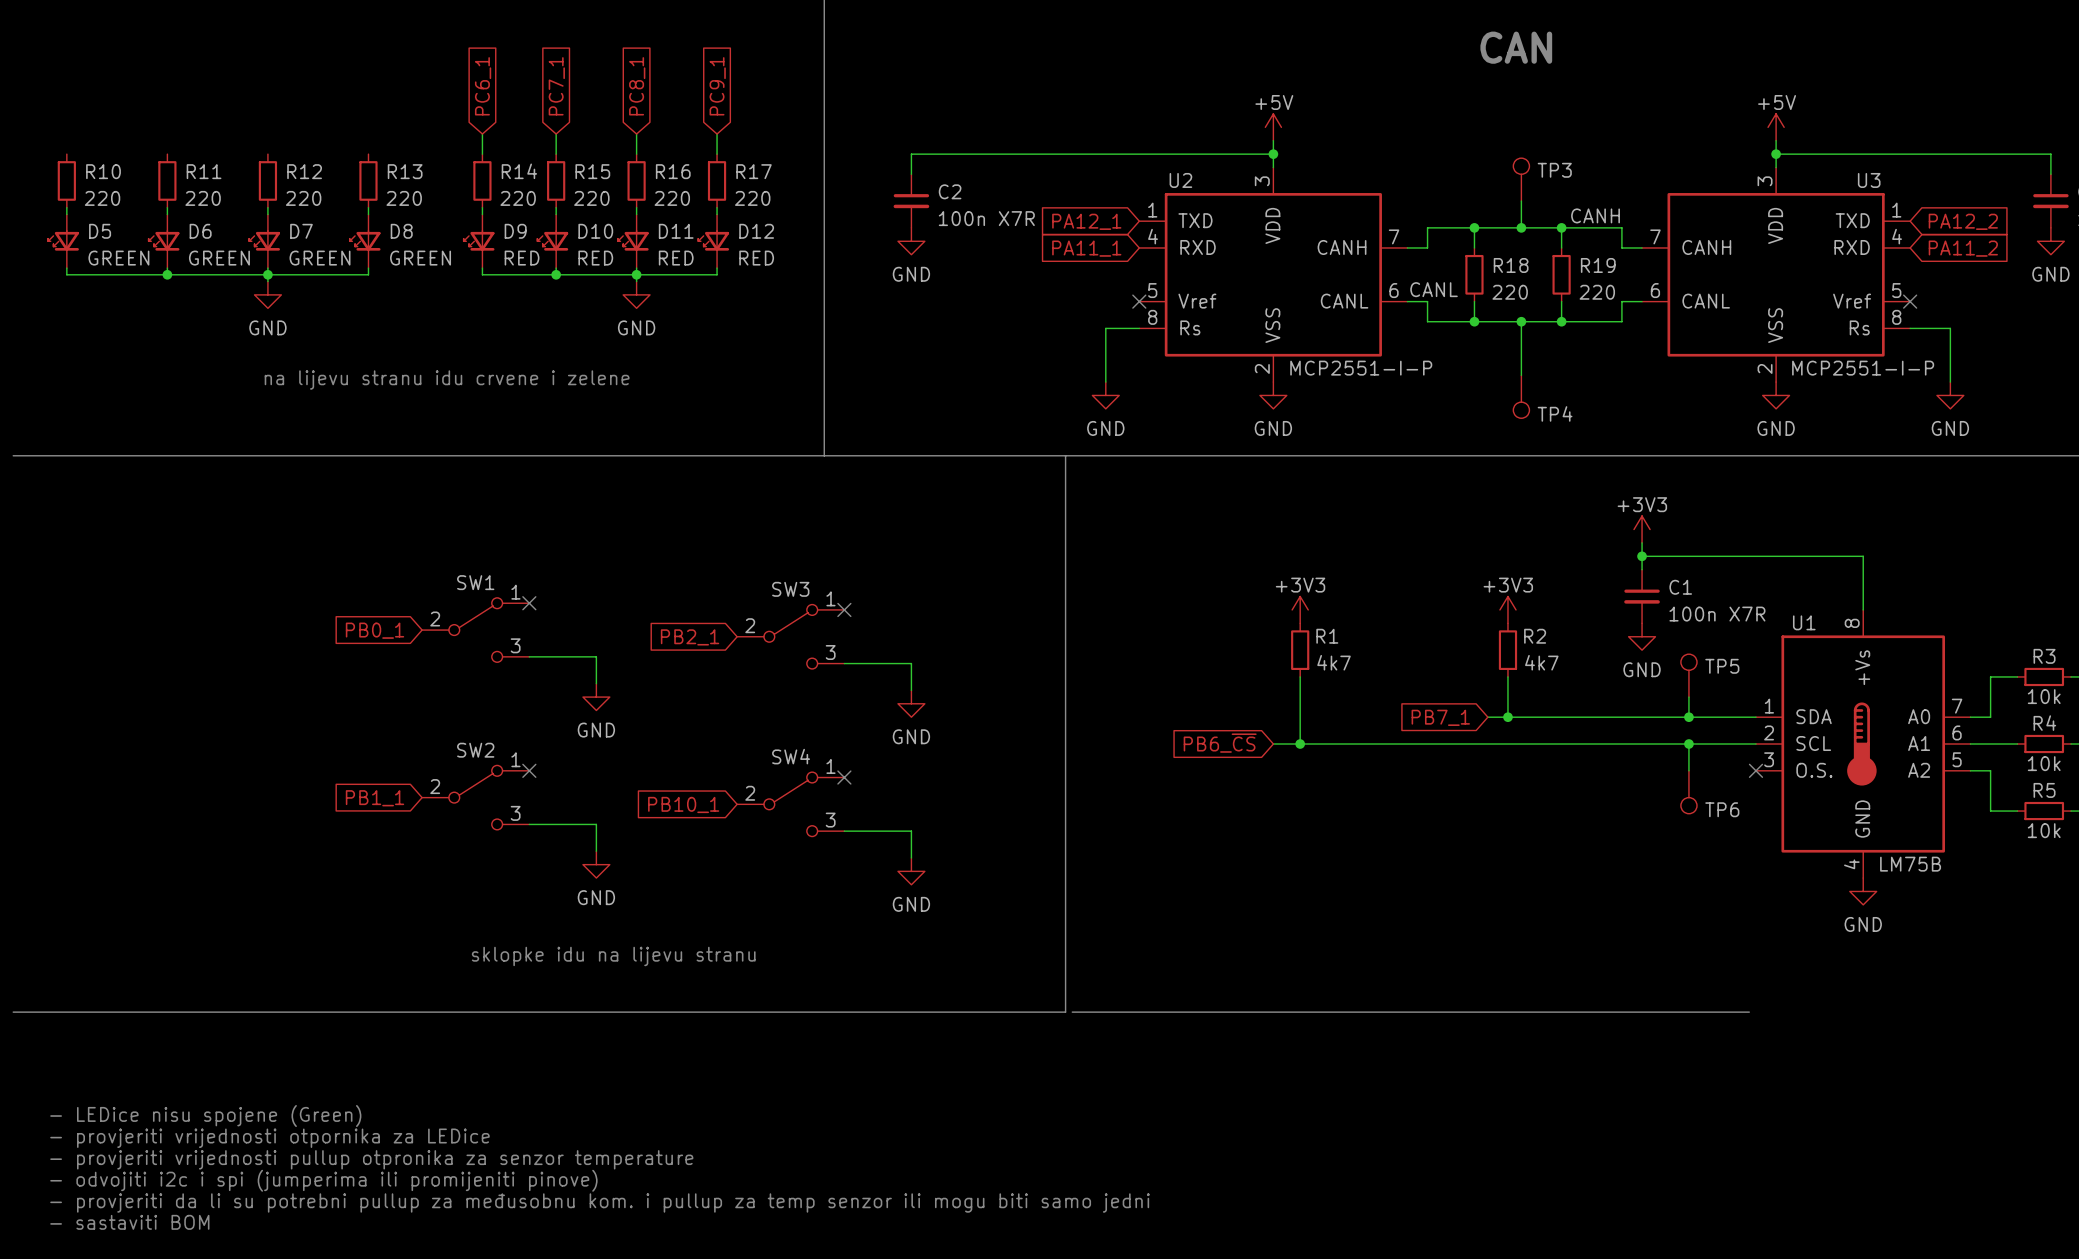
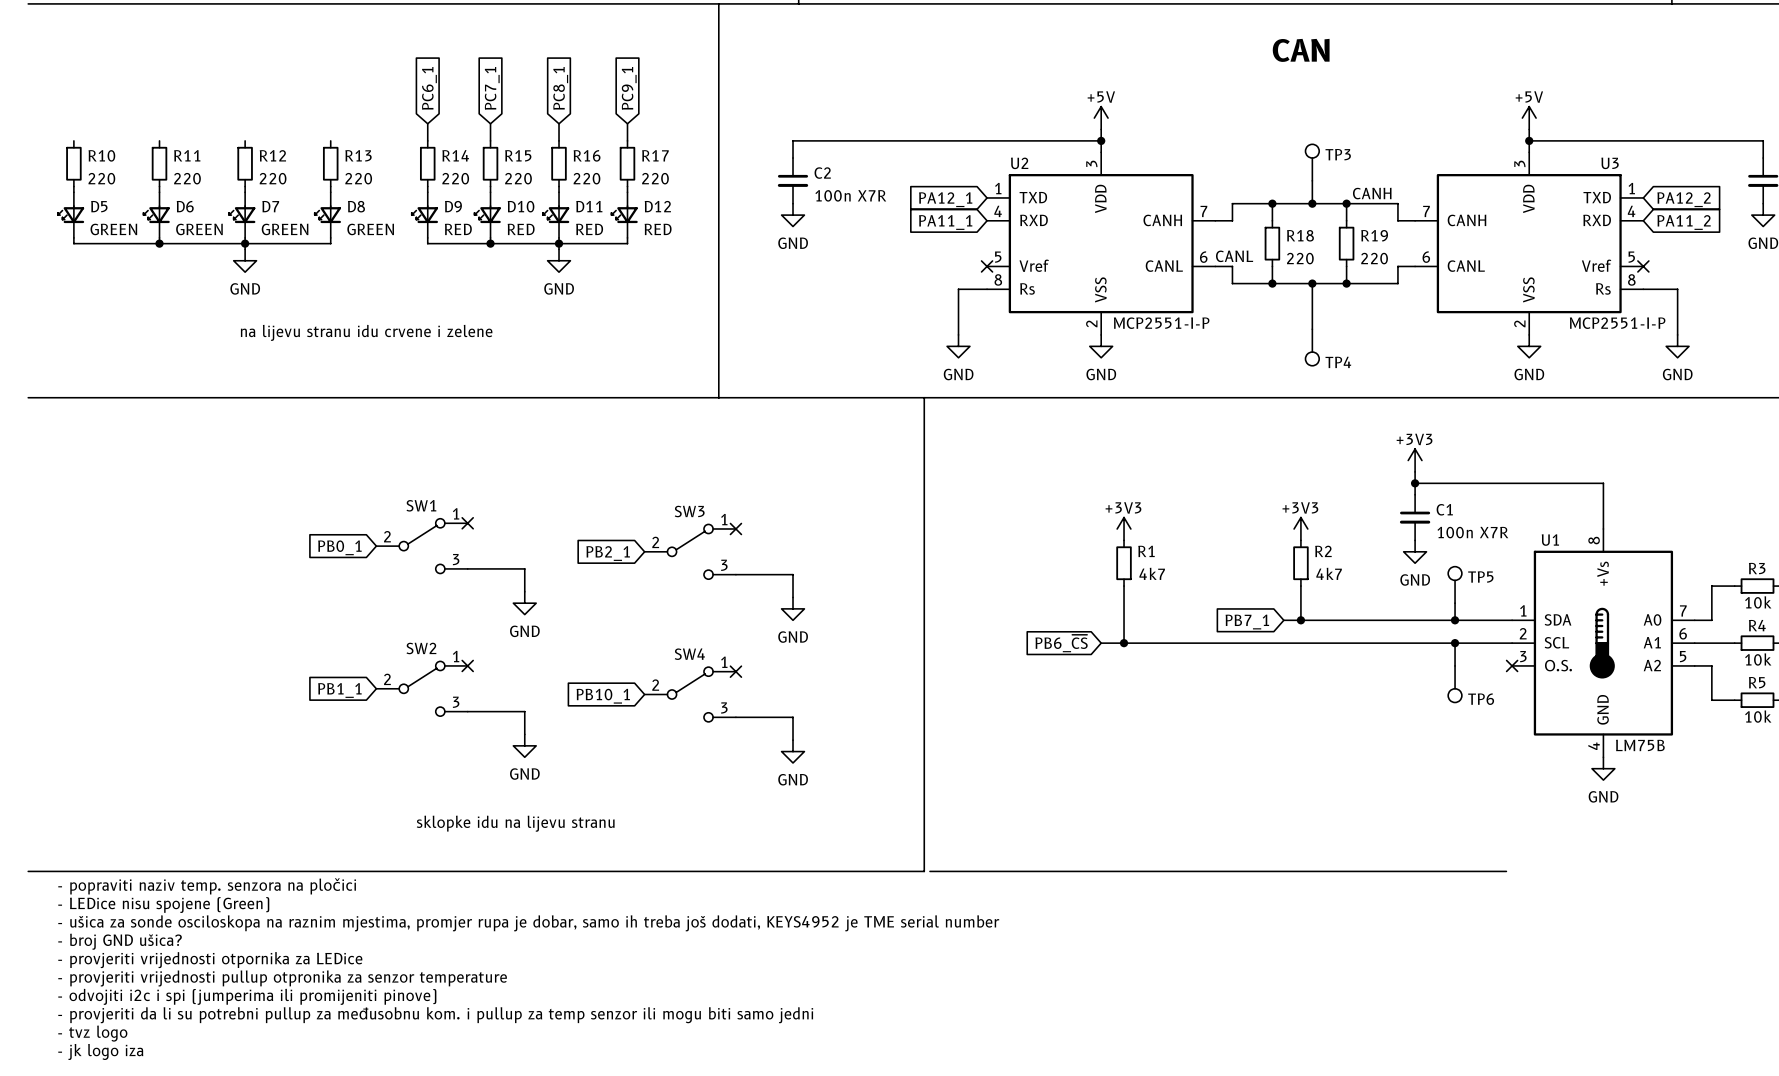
text: none -> - popraviti naziv temp. senzora na pločici (207, 886)
text: none -> - LEDice nisu spojene (Green) (163, 905)
text: none -> - ušica za sonde osciloskopa na raznim mjestima, promjer rupa je dobar, samo ih treba još dodati, KEYS4952 je TME serial number (528, 923)
text: none -> - broj GND ušica? (120, 941)
text: - LEDice nisu spojene (Green) (205, 1116) -> - provjeriti vrijednosti otpornika za LEDice (210, 960)
text: - provjeriti vrijednosti otpornika za LEDice (269, 1138) -> - provjeriti vrijednosti pullup otpronika za senzor temperature (282, 978)
text: - provjeriti vrijednosti pullup otpronika za senzor temperature (371, 1159) -> - odvojiti i2c i spi (jumperima ili promijeniti pinove) (247, 996)
text: - odvojiti i2c i spi (jumperima ili promijeniti pinove) (323, 1180) -> - provjeriti da li su potrebni pullup za međusobnu kom. i pullup za temp senzor ili mogu biti samo jedni (435, 1015)
text: - provjeriti da li su potrebni pullup za međusobnu kom. i pullup za temp senzor ili mogu biti samo jedni (599, 1202) -> - tvz logo (92, 1033)
text: - sastaviti BOM (129, 1222) -> - jk logo iza (100, 1051)

